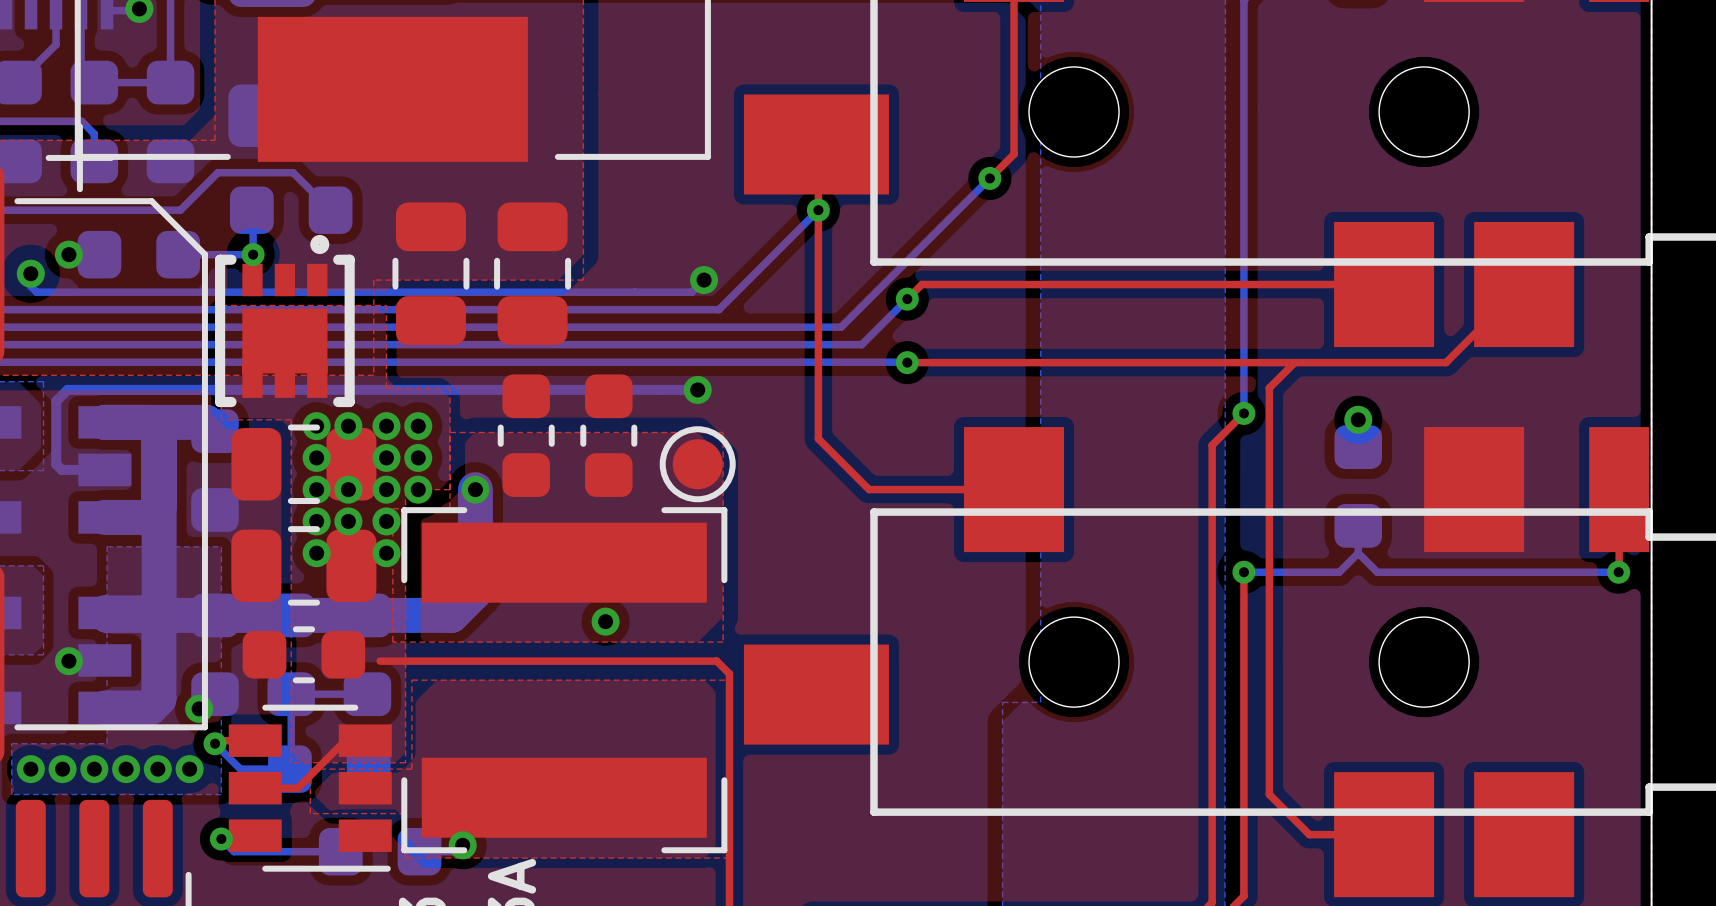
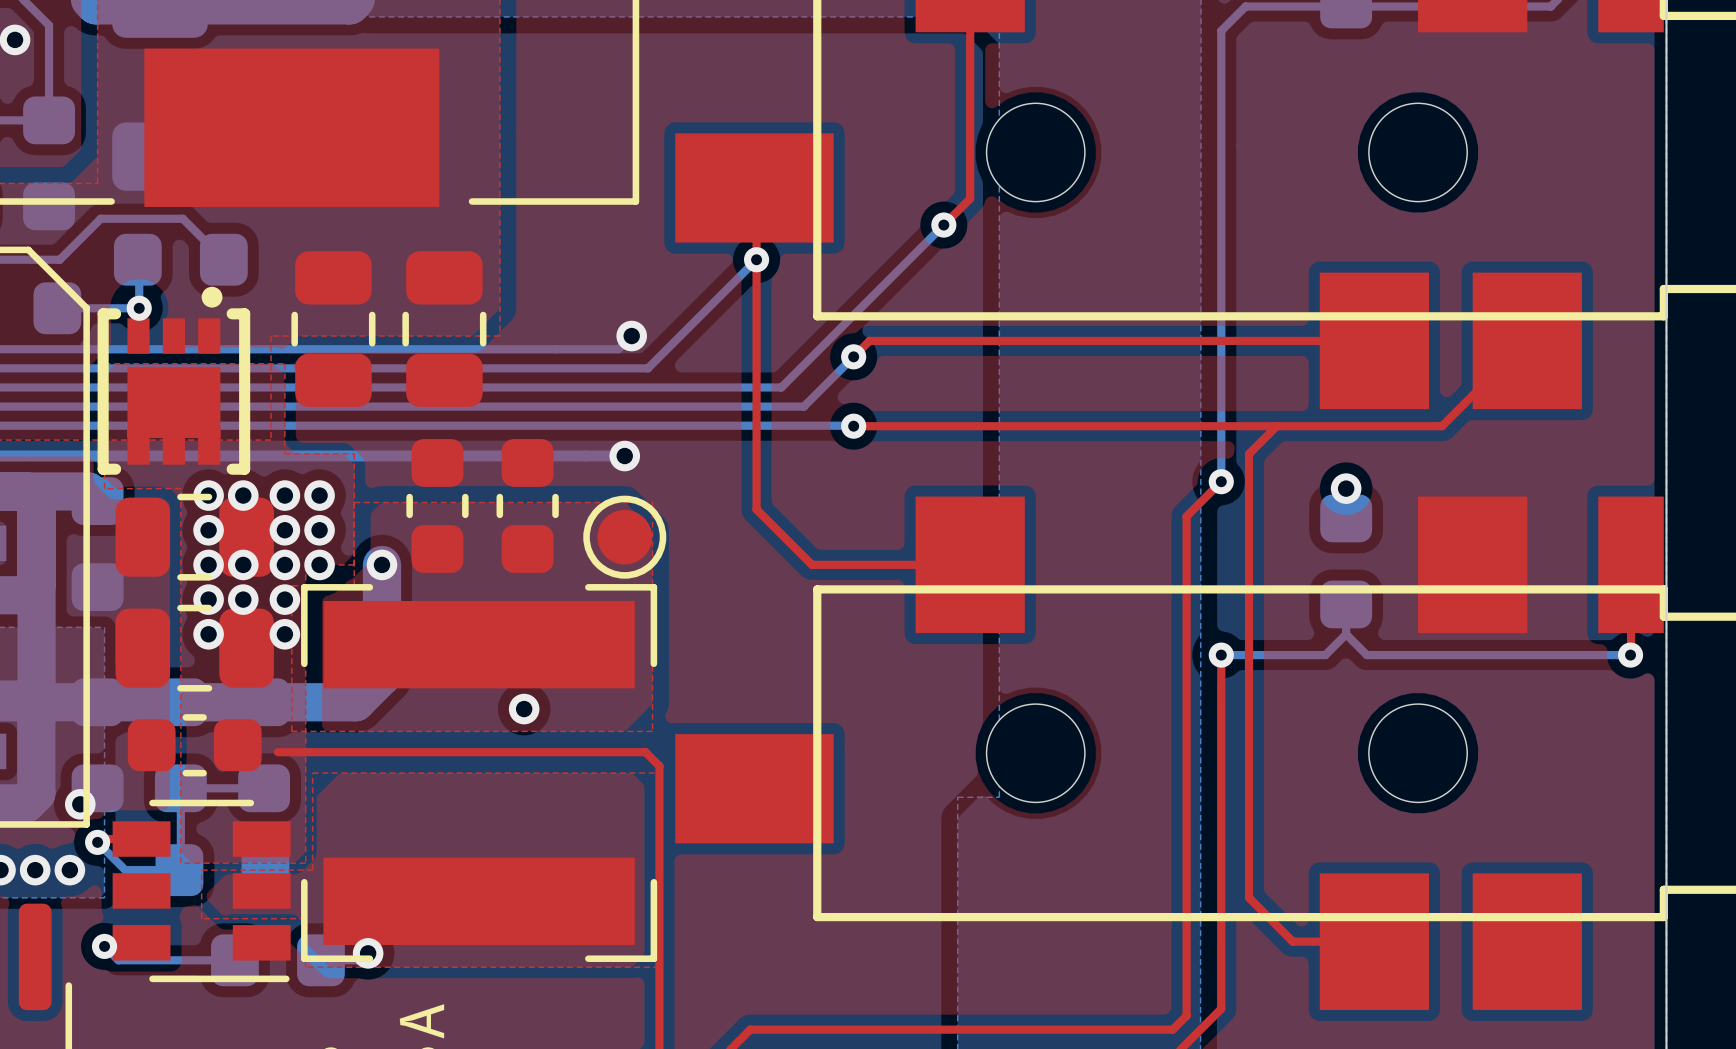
top track: (345, 740) (297, 788) (255, 788) -> none

